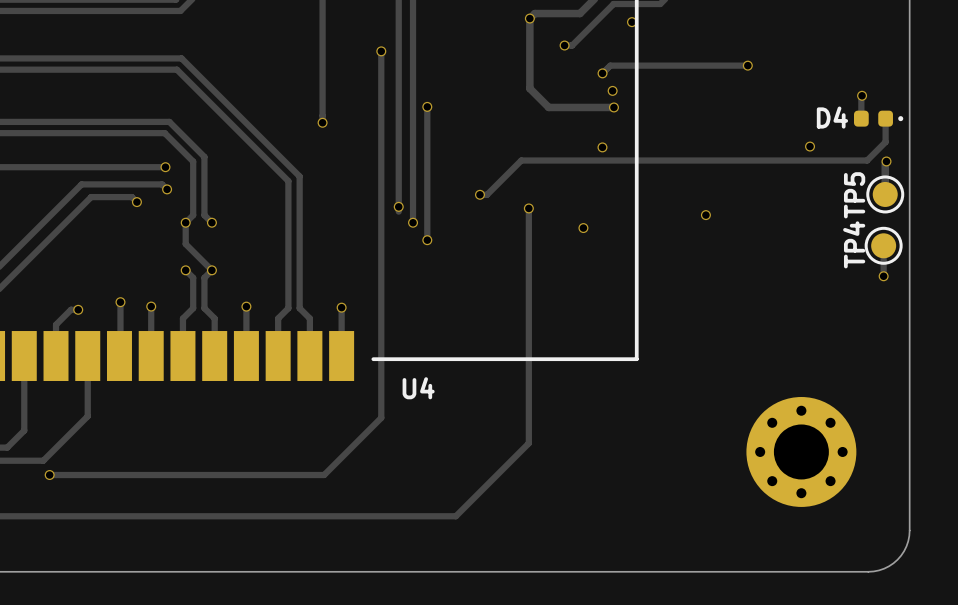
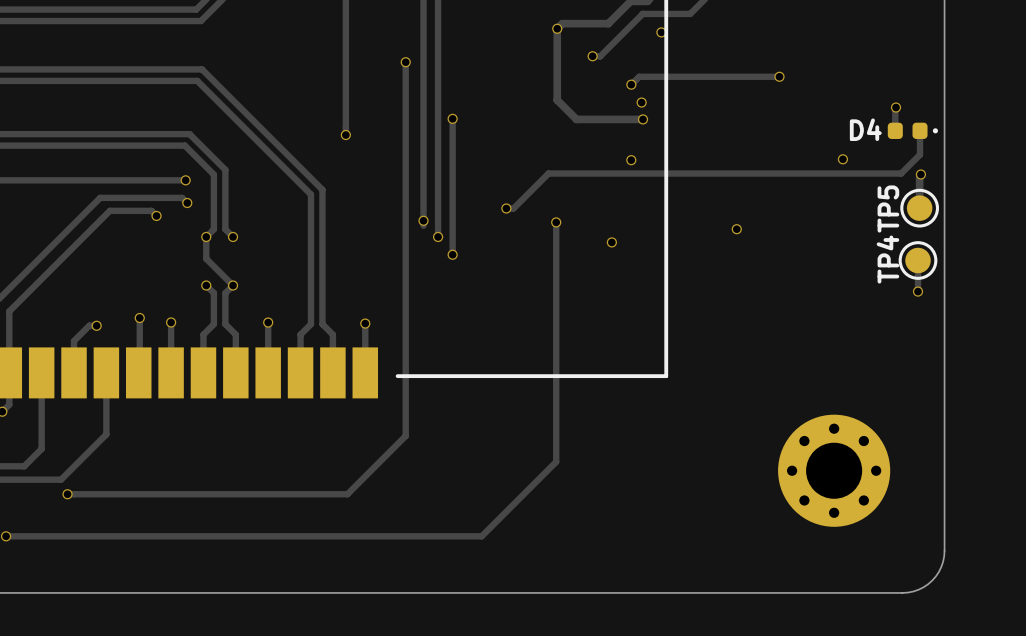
U4 name: U4 (418, 388) -> none

